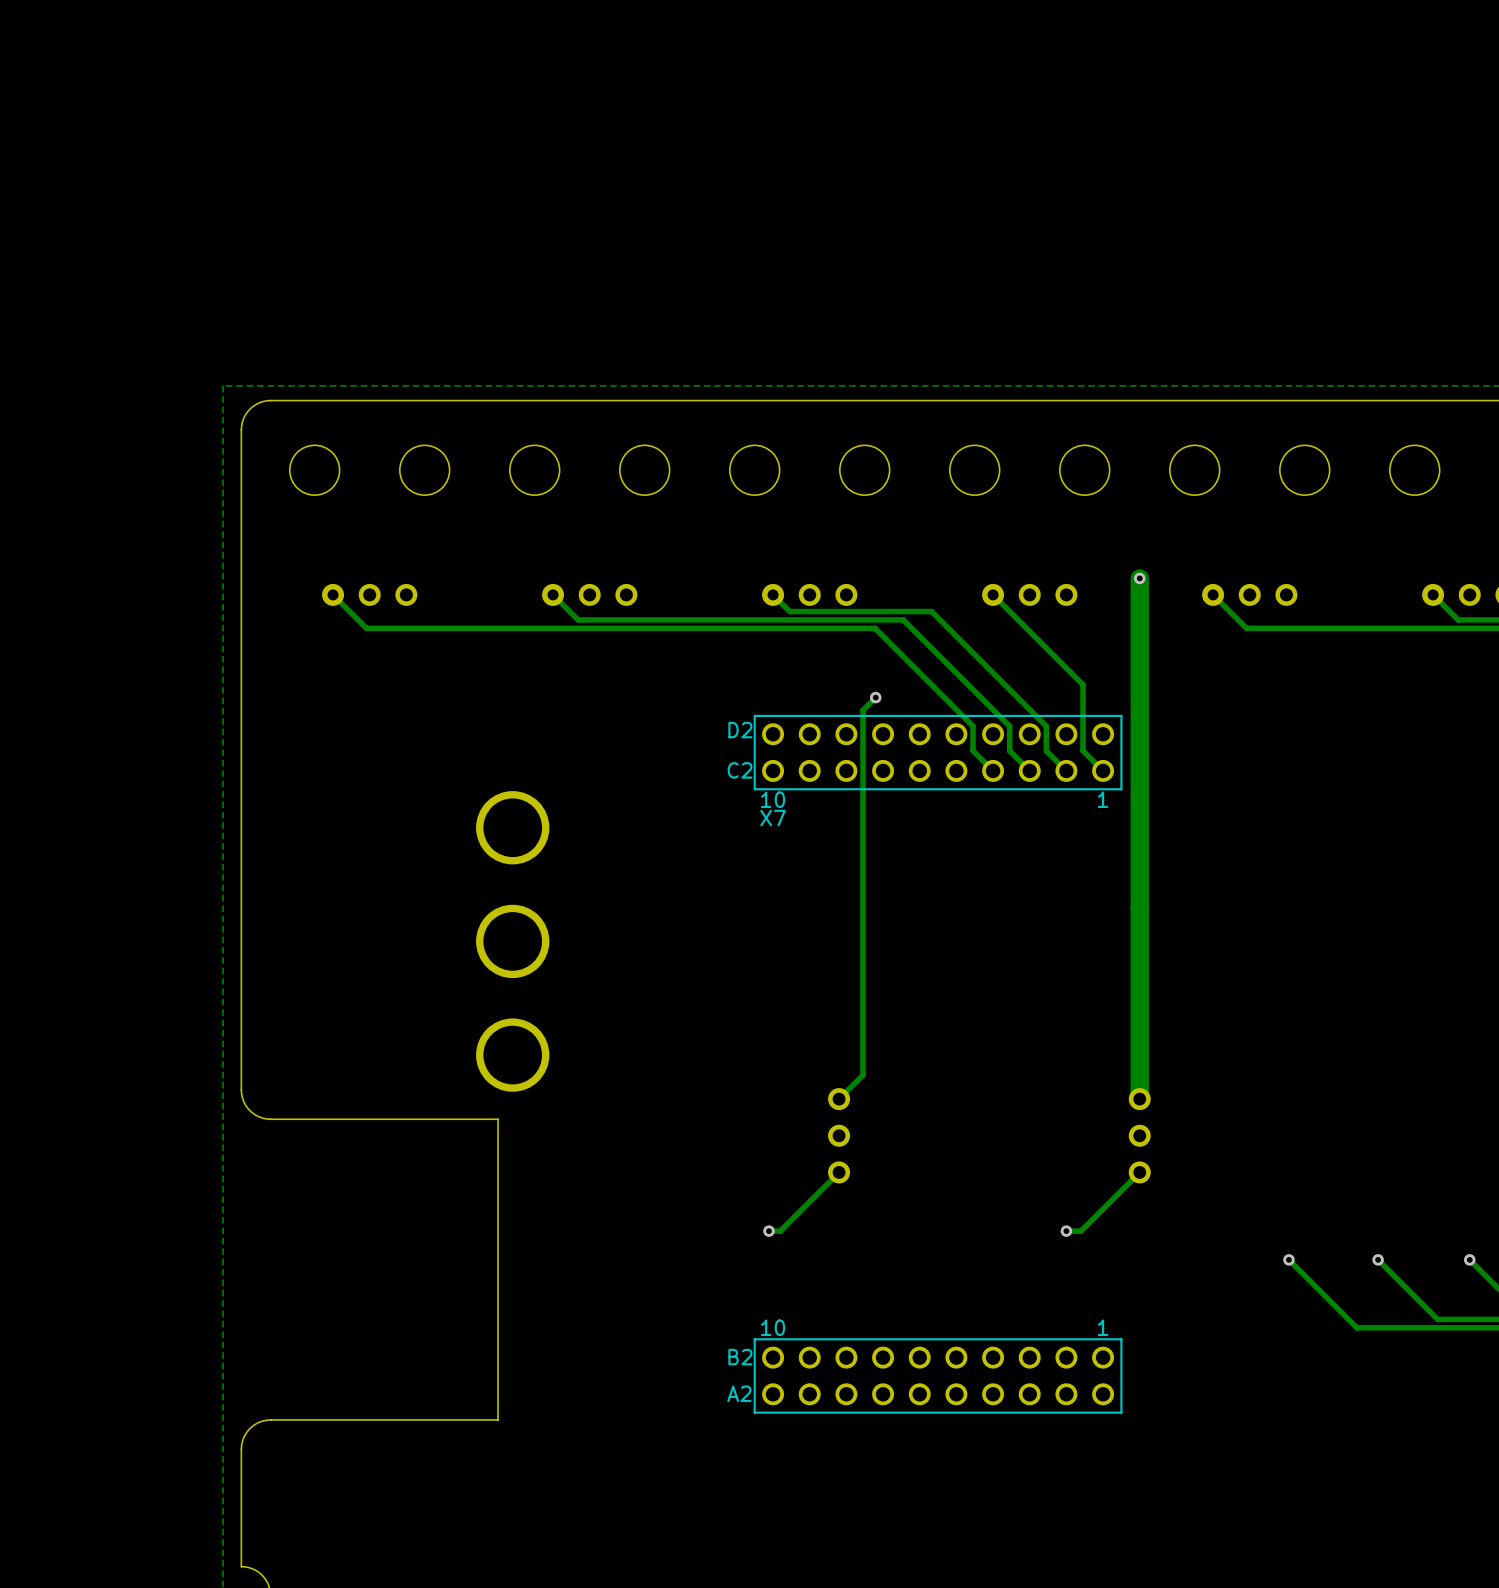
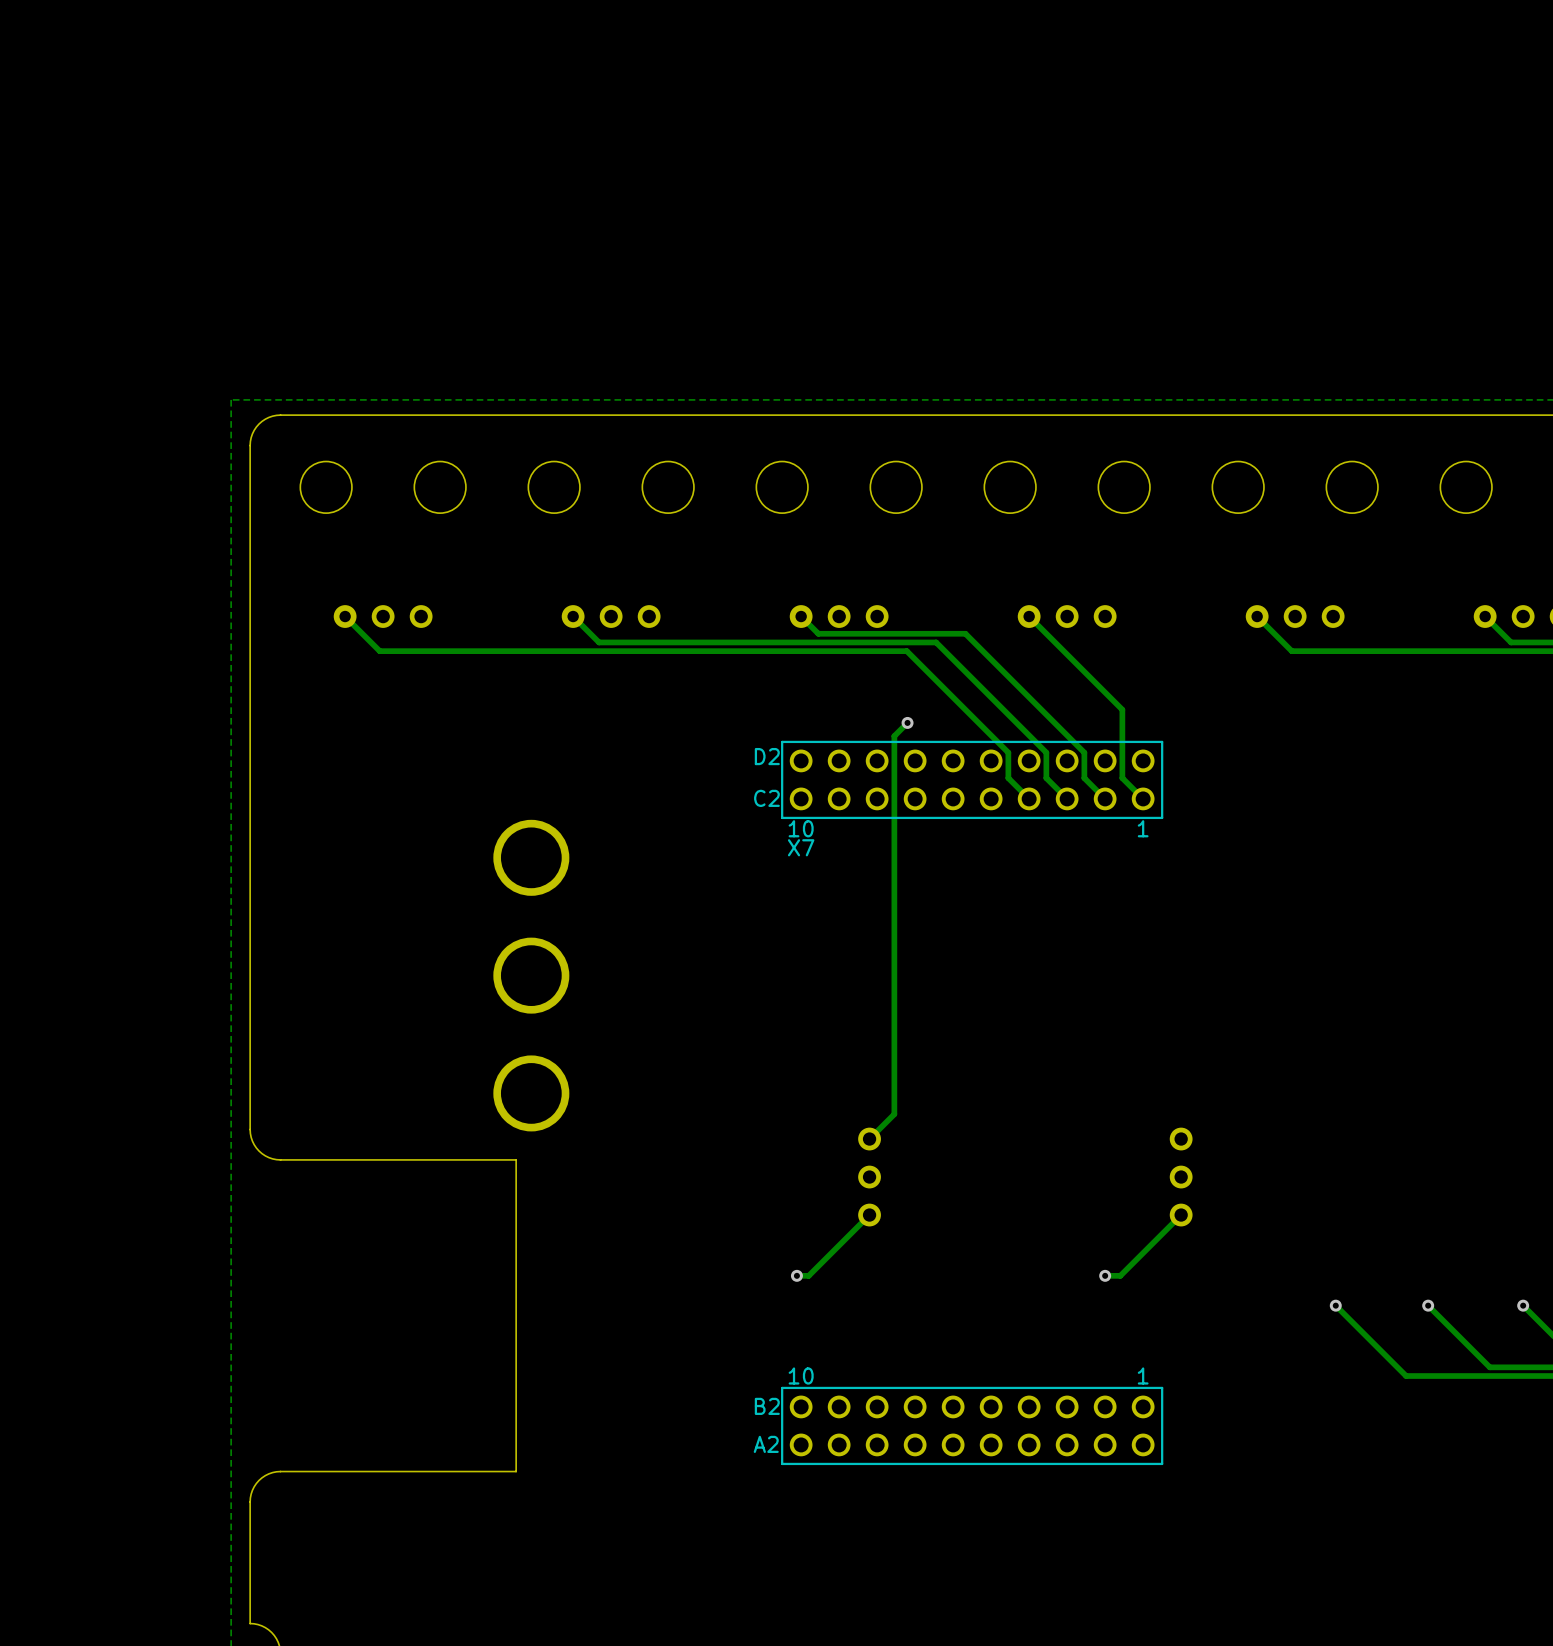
track: (1139, 578) (1139, 1099) -> none
via: (1139, 578) -> none

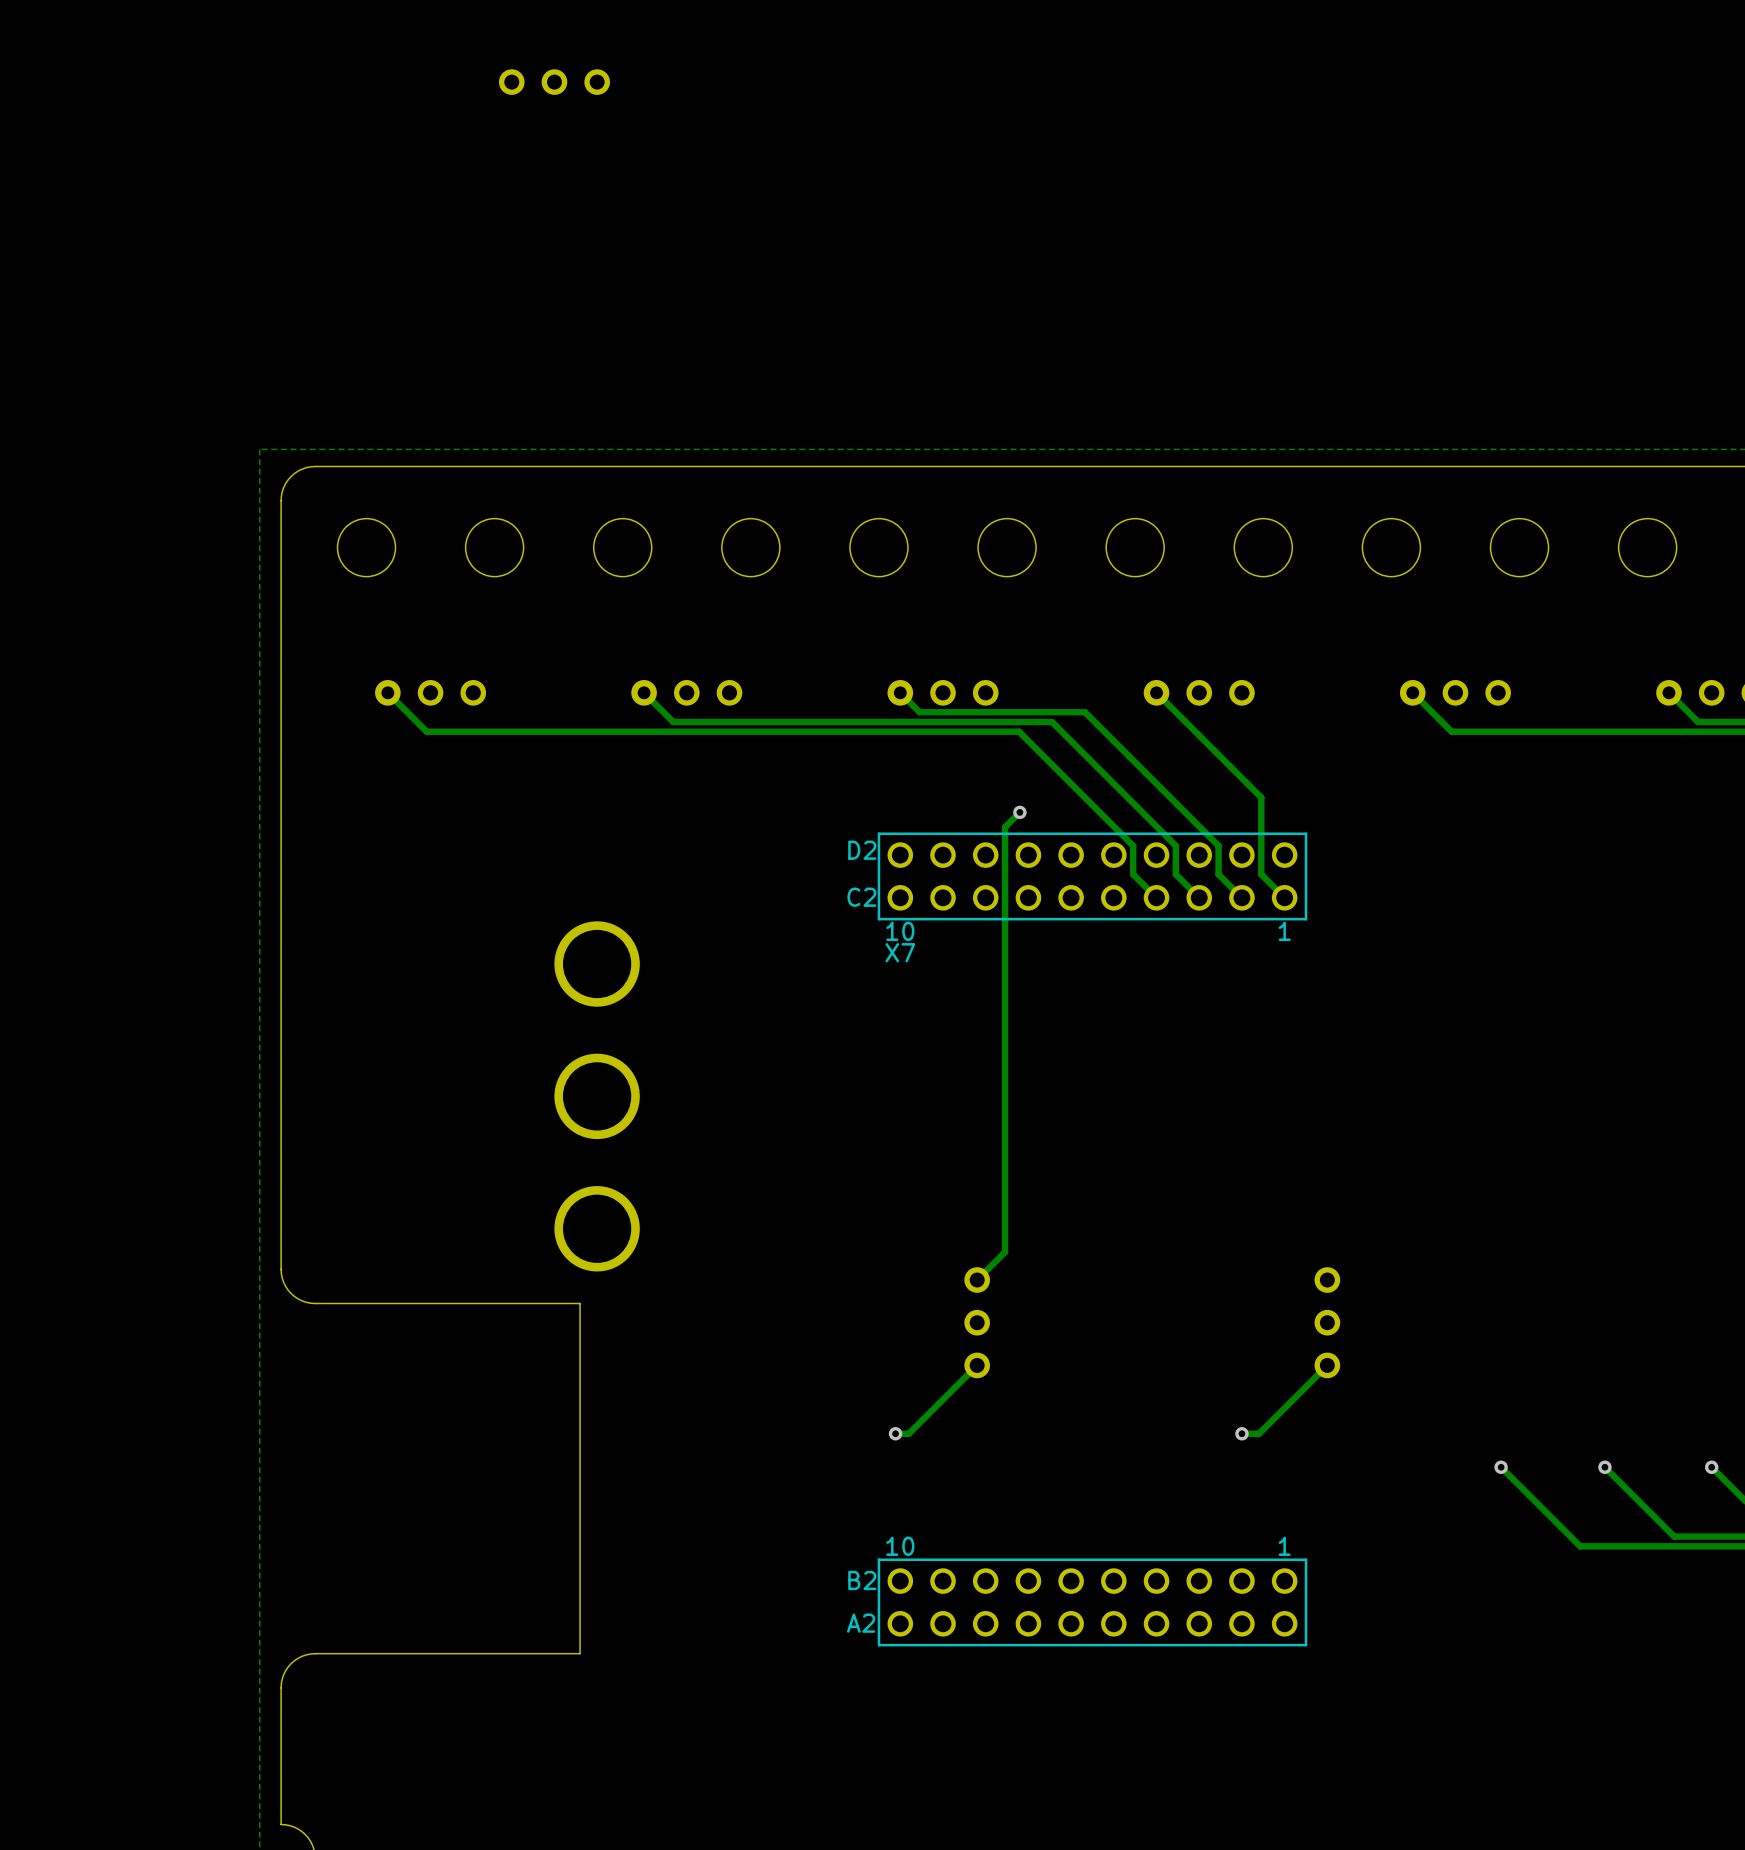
part: none -> (554, 82)

